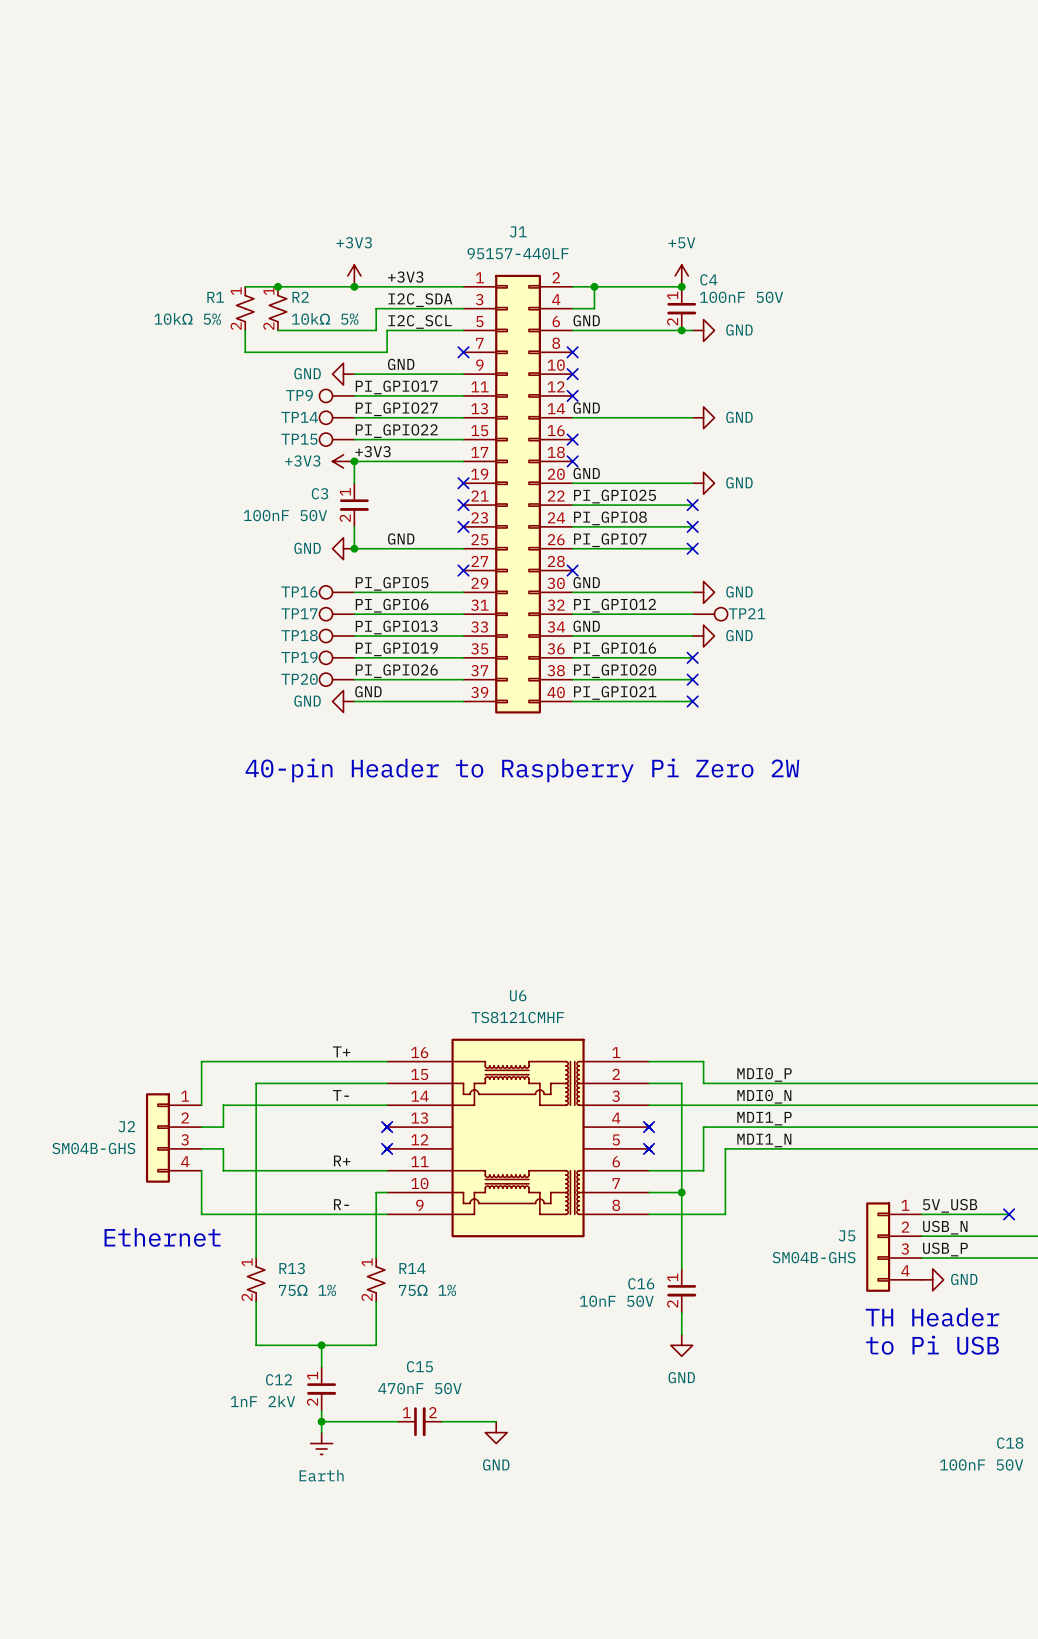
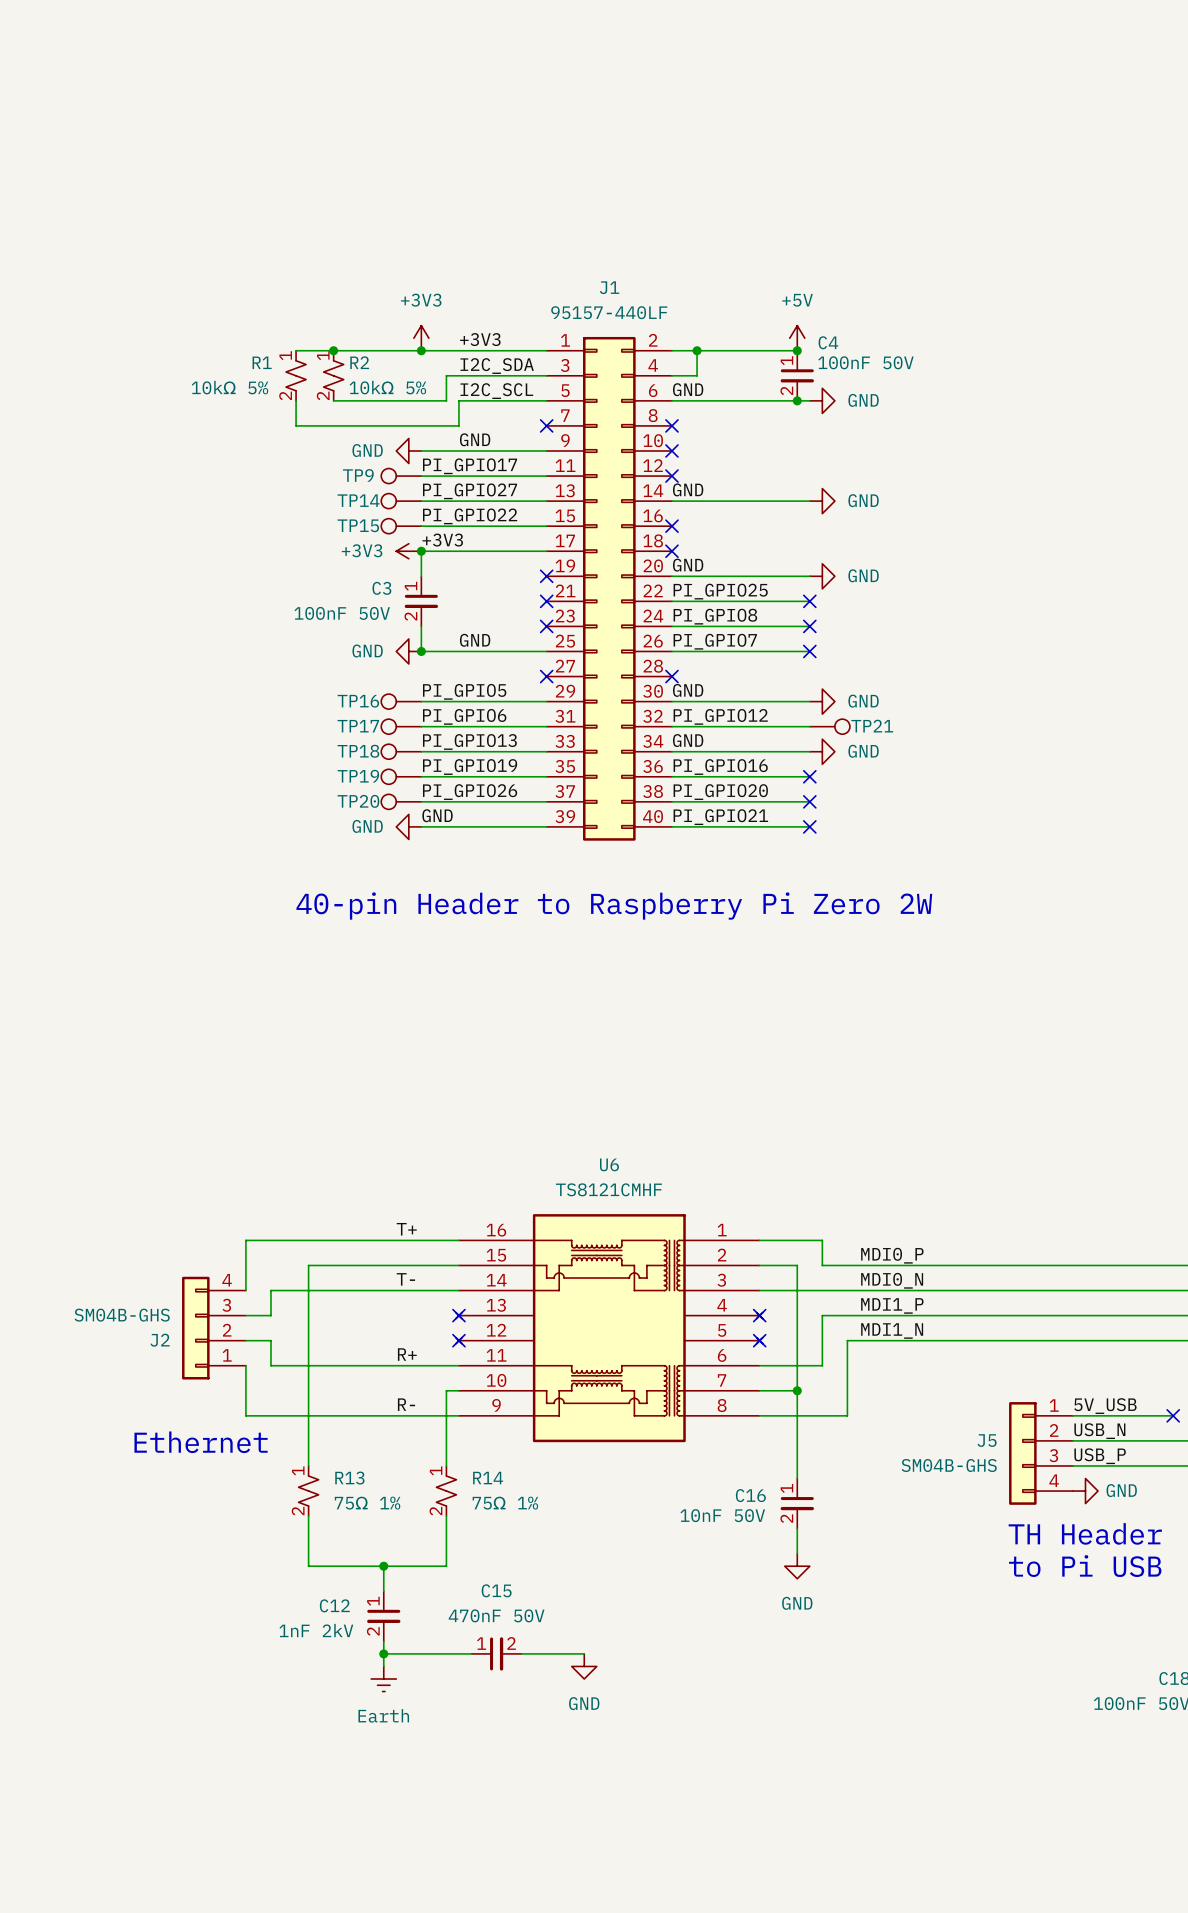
J2 flip: as is (157, 1137) -> up-down (195, 1328)

